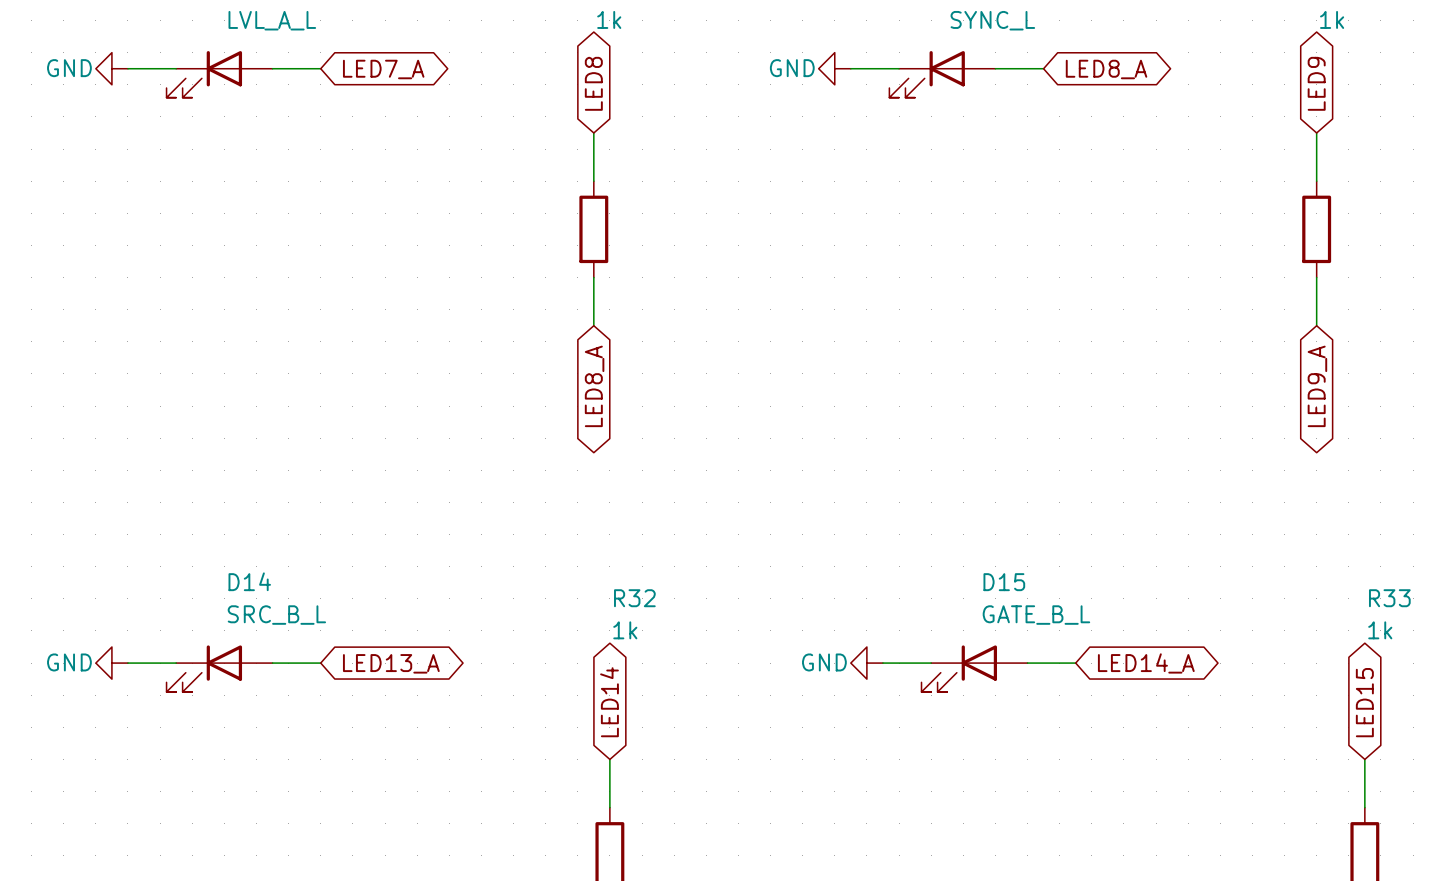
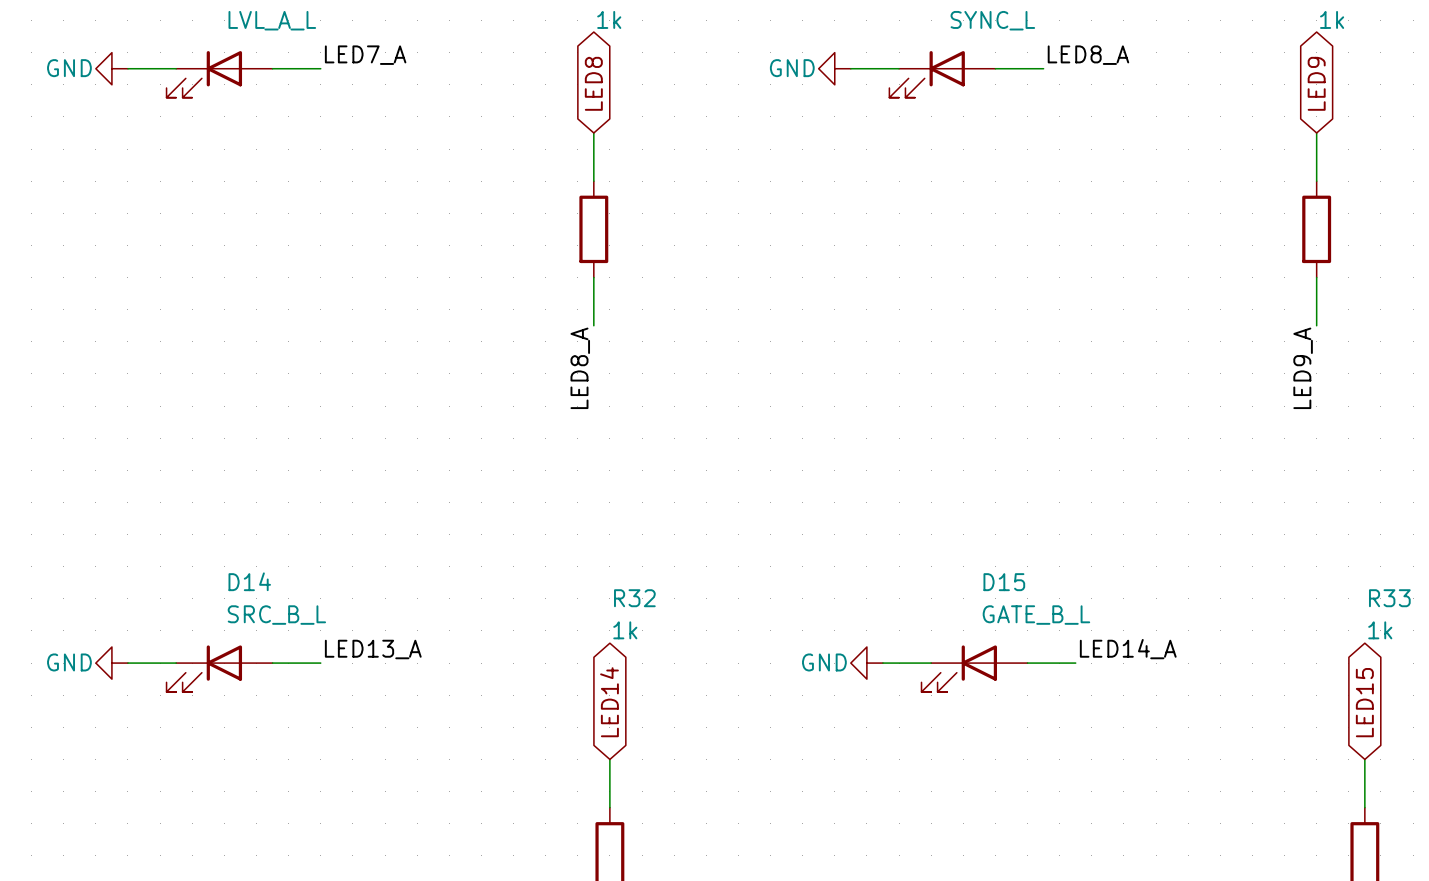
label: none -> LED7_A (365, 55)
label: none -> LED8_A (1088, 55)
global label: LED7_A (383, 69) -> none
global label: LED8_A (1106, 69) -> none
label: none -> LED8_A (580, 368)
label: none -> LED9_A (1303, 368)
global label: LED8_A (594, 386) -> none
global label: LED9_A (1317, 386) -> none
label: none -> LED13_A (373, 649)
label: none -> LED14_A (1128, 649)
global label: LED13_A (391, 663) -> none
global label: LED14_A (1146, 663) -> none

